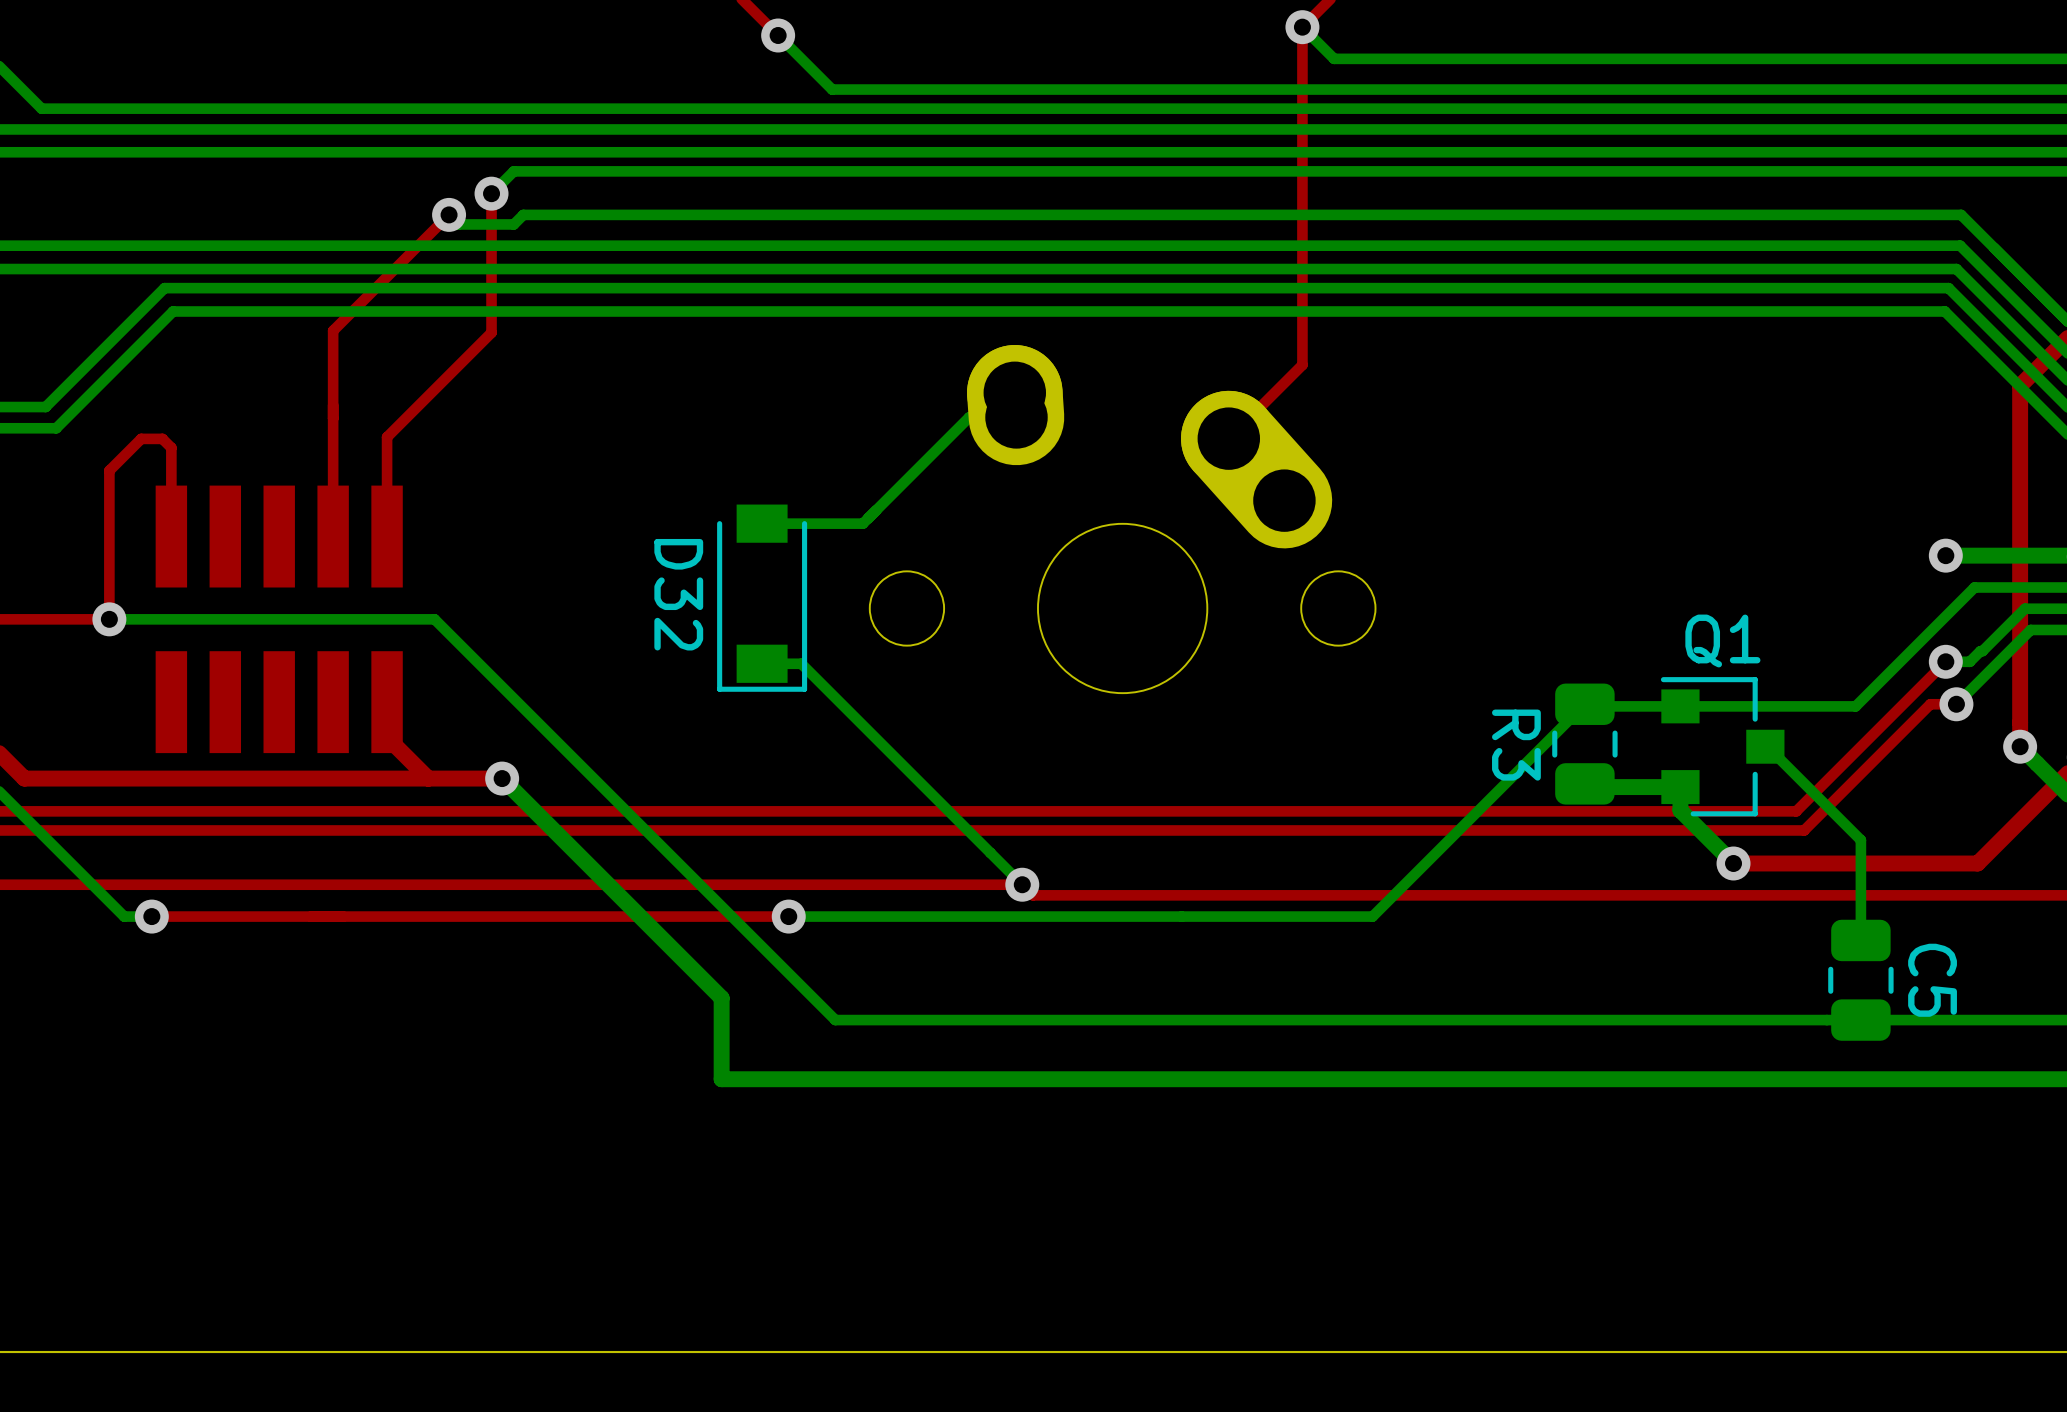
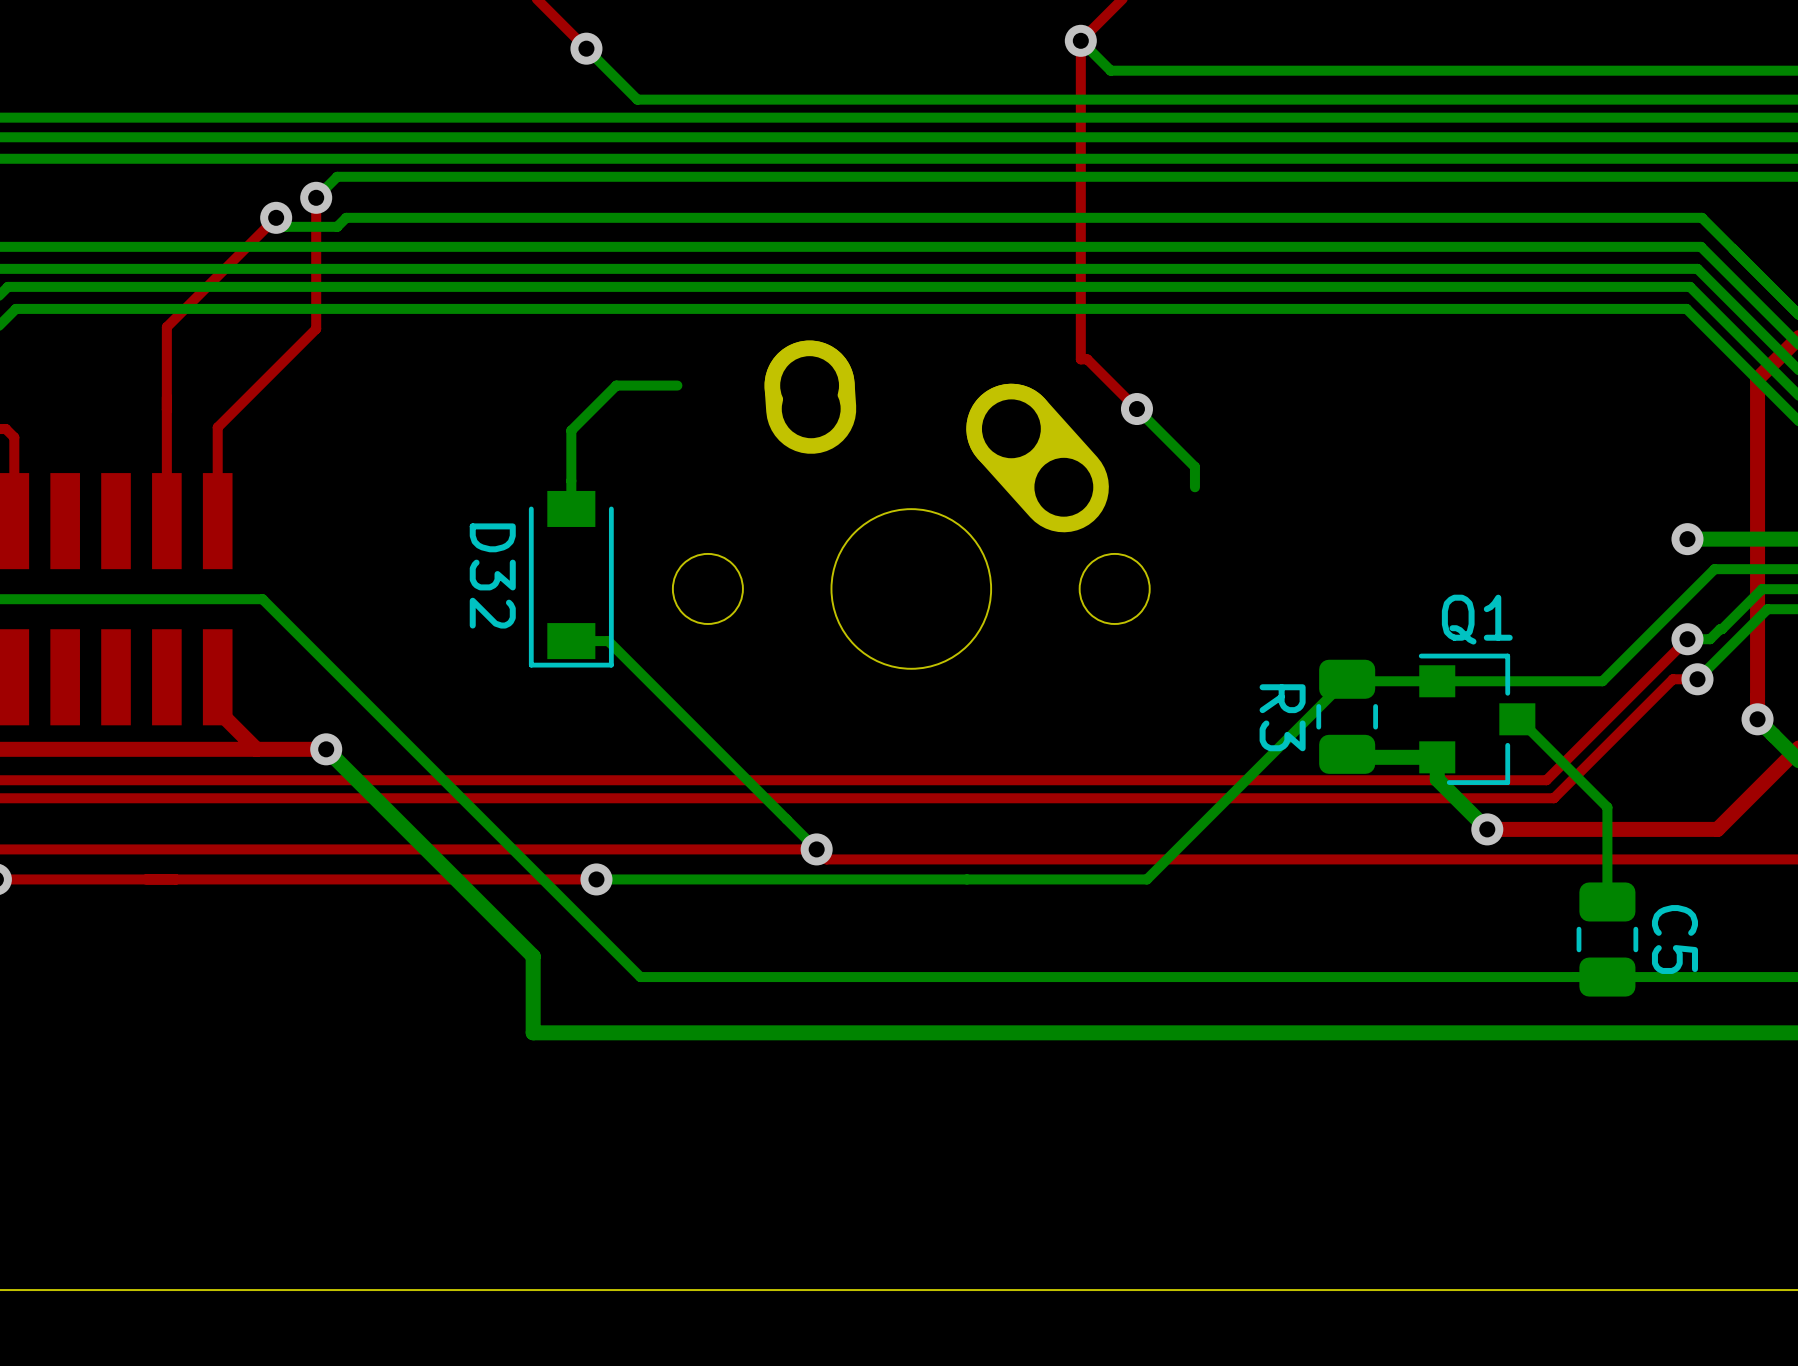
top track: (1302, 365) (1228, 438) -> (1080, 359) (1087, 359) (1136, 409)
bottom track: (1016, 417) (969, 417) (862, 523) (762, 523) -> (677, 385) (616, 385) (571, 430) (571, 508)
bottom track: none -> (1136, 409) (1194, 467) (1194, 487)
via: none -> (1136, 409)

